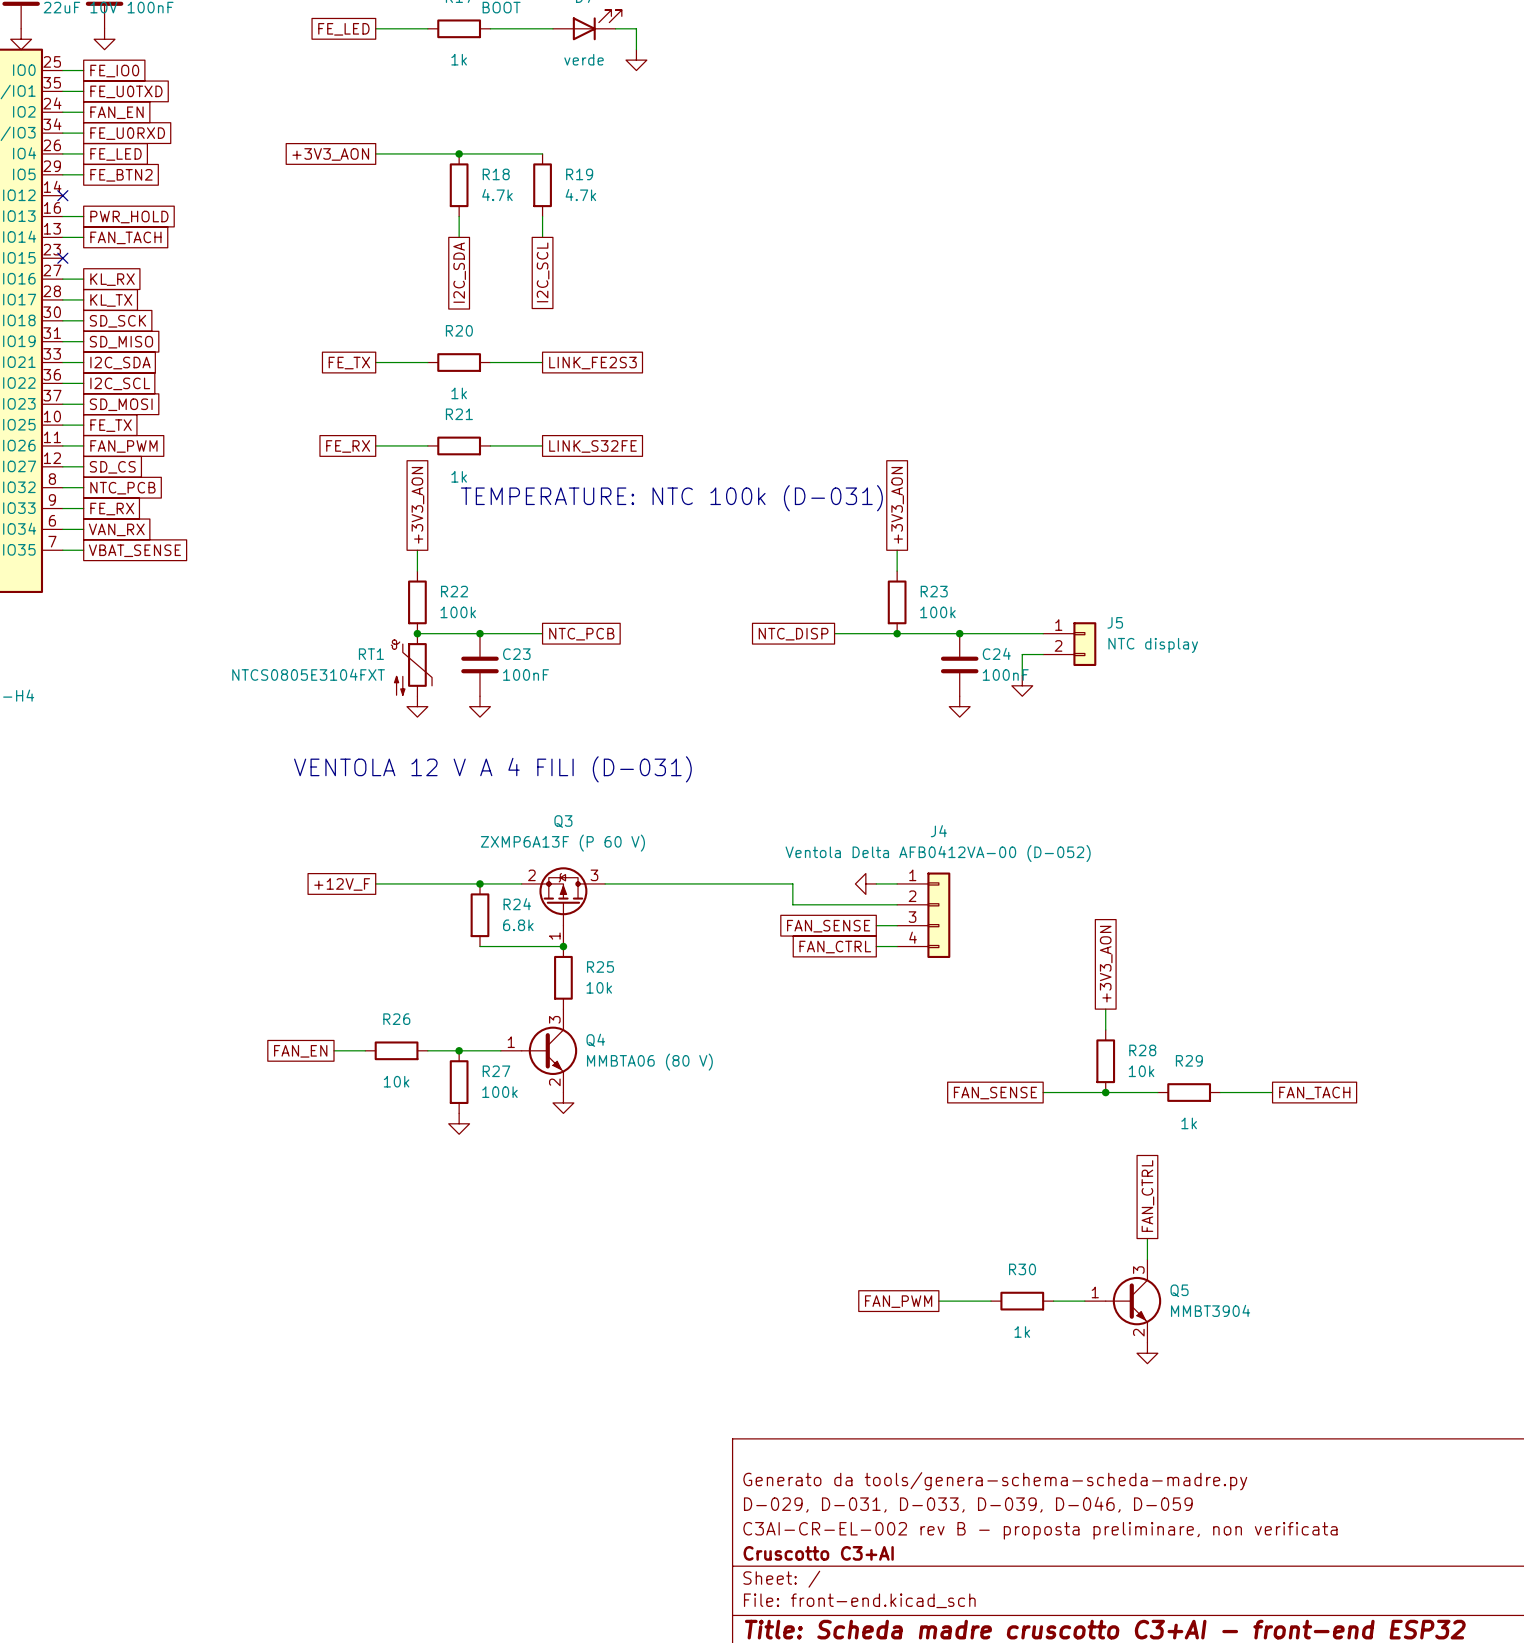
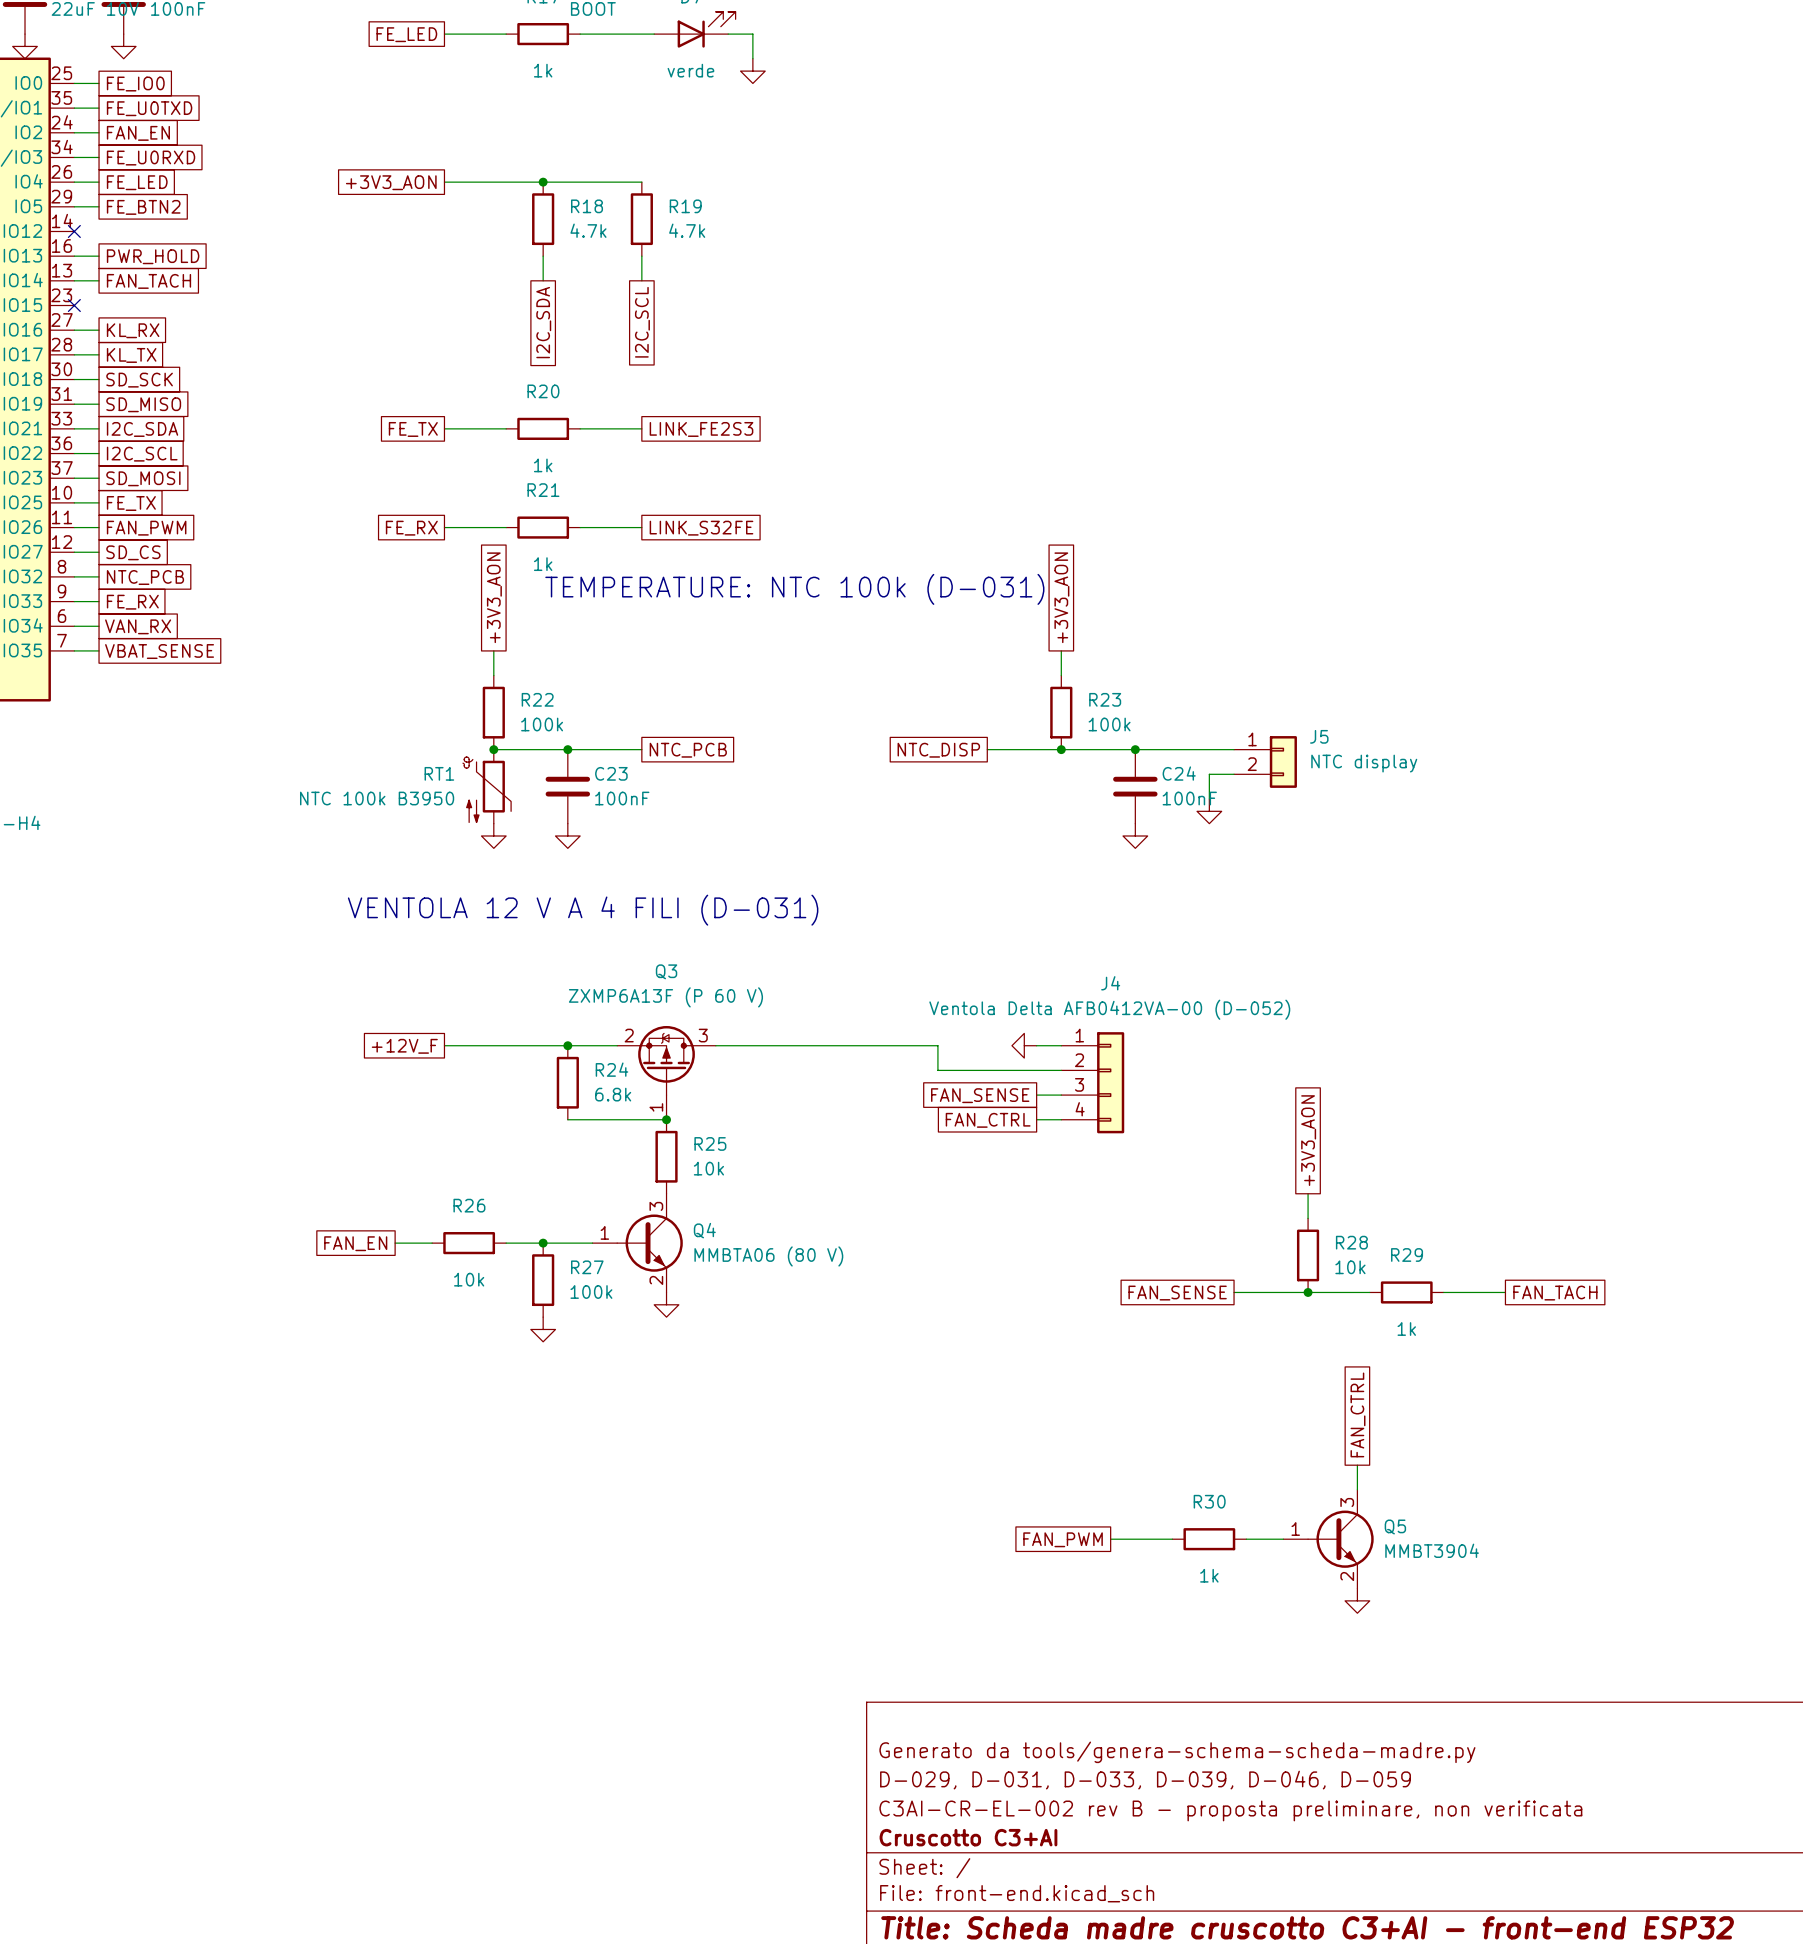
RT1 value: NTCS0805E3104FXT (308, 674) -> NTC 100k B3950 (377, 798)

